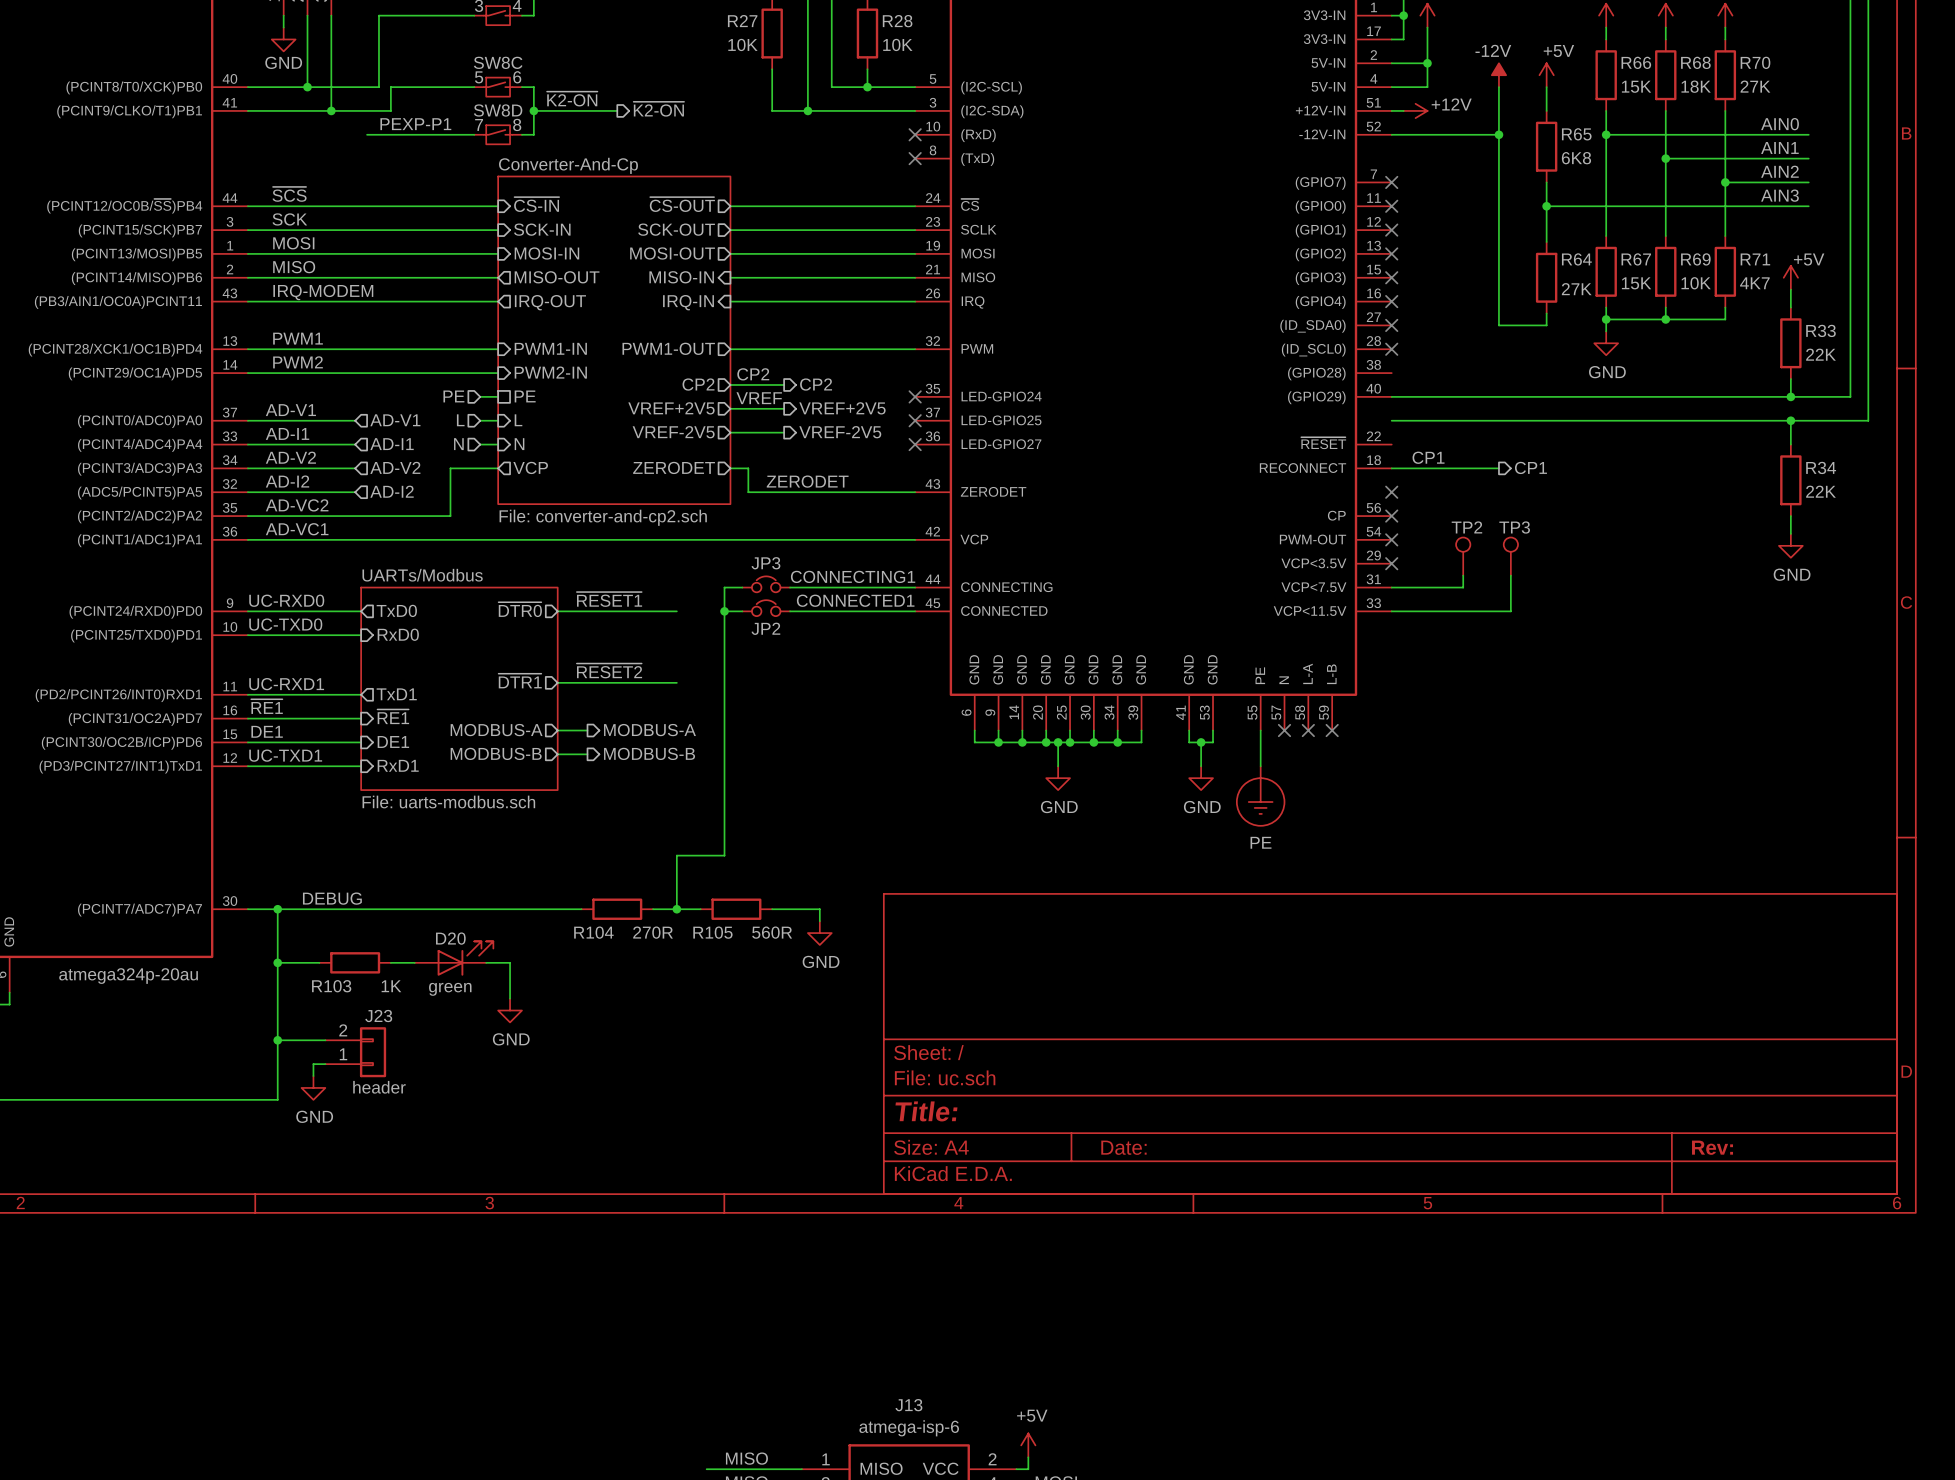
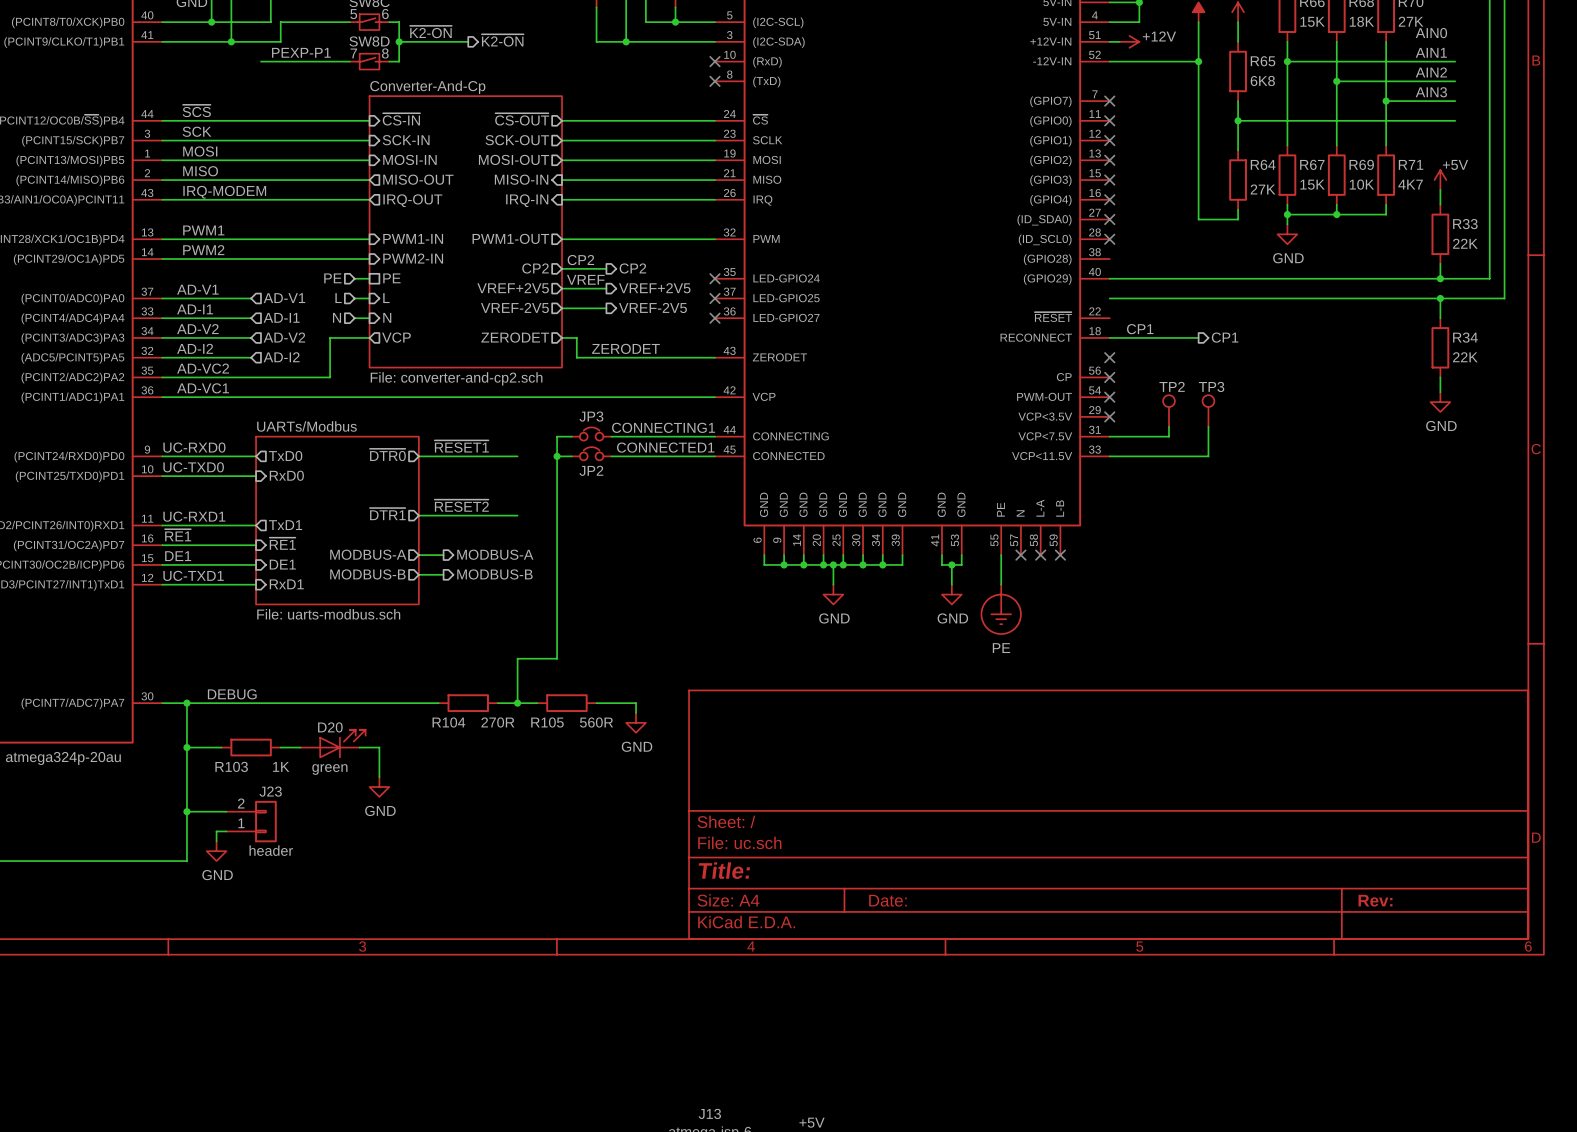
label: none -> AIN0 (1431, 33)
label: AIN0 (1780, 124) -> AIN1 (1431, 52)
label: AIN1 (1779, 147) -> AIN2 (1431, 72)
label: AIN2 (1779, 171) -> AIN3 (1431, 92)
label: AIN3 (1779, 195) -> none

